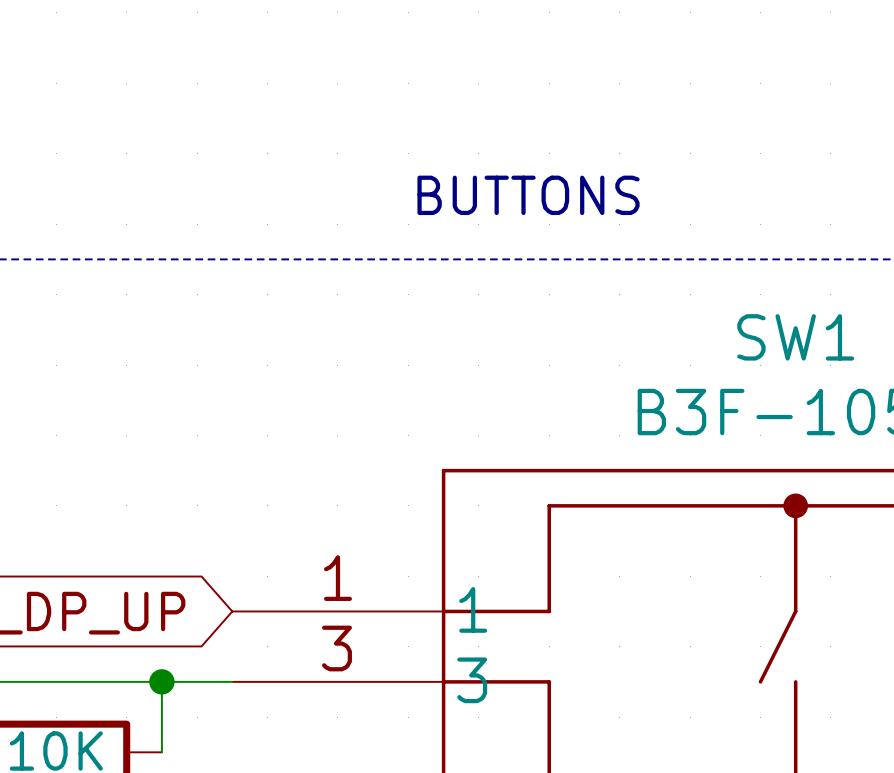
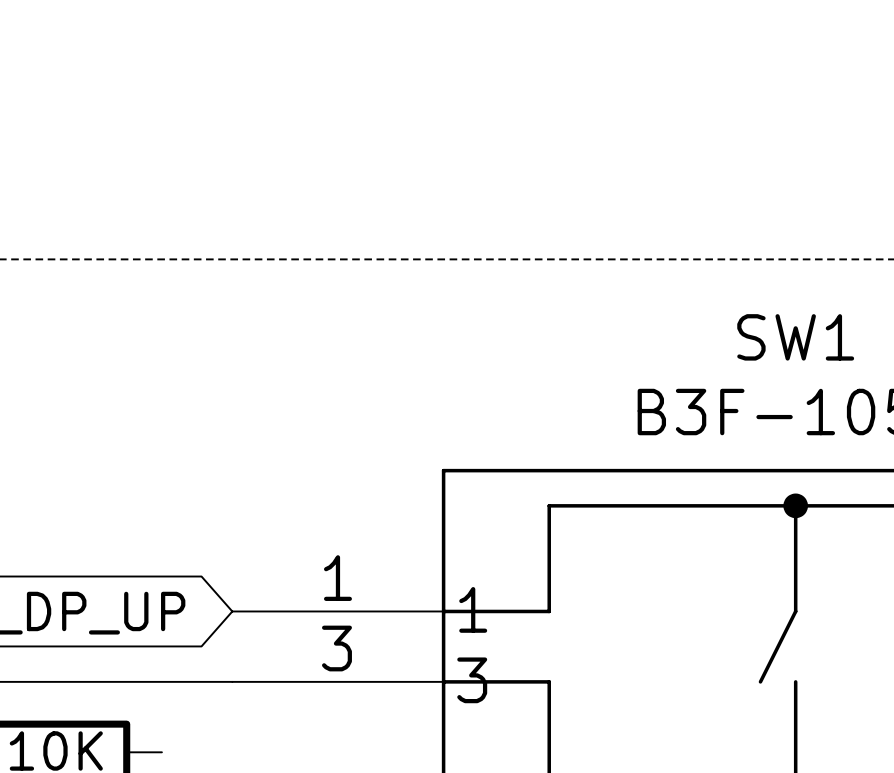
text: BUTTONS (528, 195) -> none
wire: (161, 681) (161, 752) -> none
junction: (161, 681) -> none

